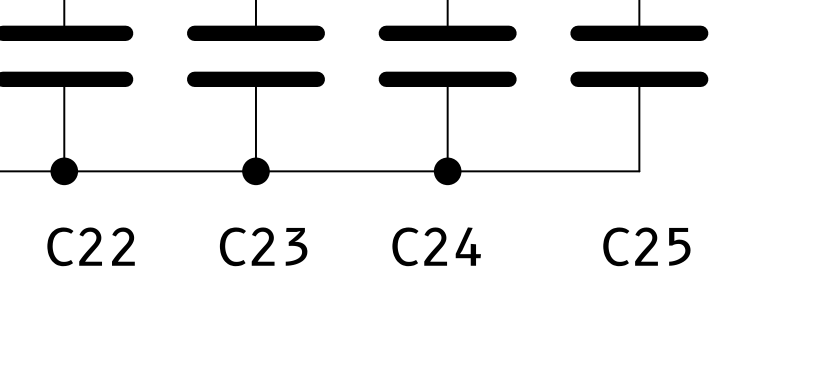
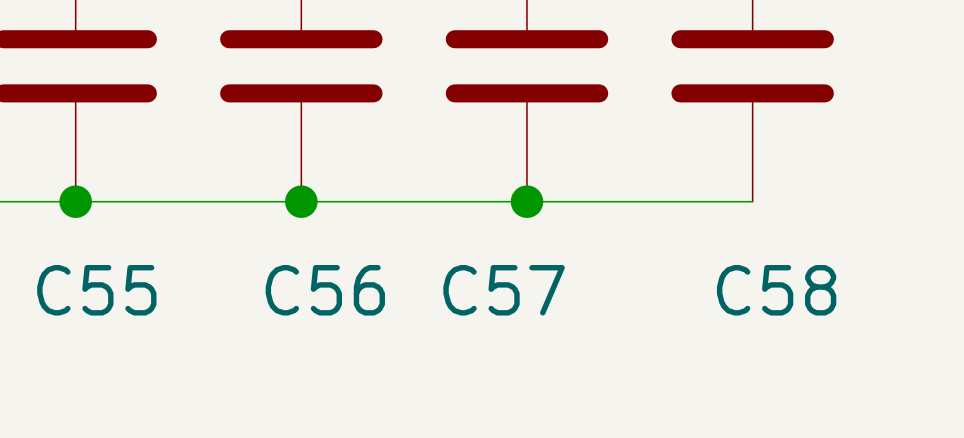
C22 name: C22 (91, 246) -> C55 (96, 290)
C23 name: C23 (263, 246) -> C56 (325, 290)
C24 name: C24 (436, 246) -> C57 (504, 290)
C25 name: C25 (646, 246) -> C58 (776, 290)

